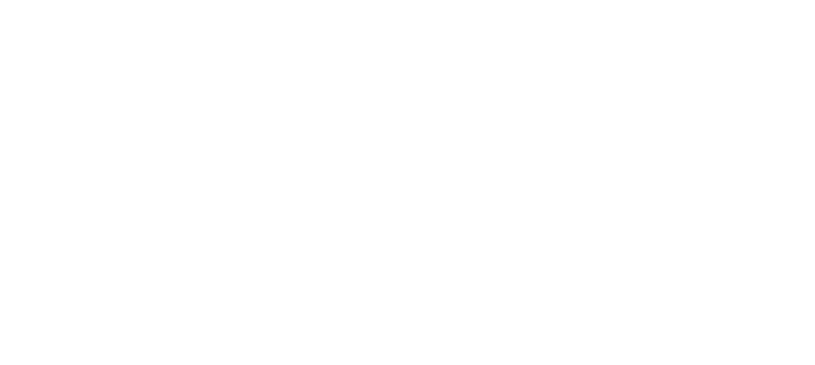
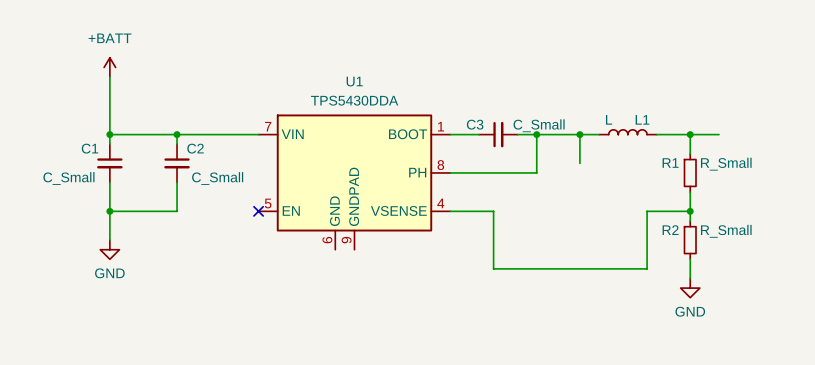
power symbol: none -> +BATT (109, 67)
wire: none -> (109, 77) (109, 144)
L1: none -> L (627, 132)
wire: none -> (109, 134) (258, 134)
junction: none -> (109, 134)
wire: none -> (177, 134) (177, 144)
junction: none -> (177, 134)
wire: none -> (450, 134) (479, 134)
C3: none -> C_Small (498, 134)
wire: none -> (517, 134) (599, 134)
wire: none -> (536, 134) (536, 172) (450, 172)
junction: none -> (536, 134)
wire: none -> (579, 134) (579, 163)
junction: none -> (579, 134)
wire: none -> (656, 134) (719, 134)
wire: none -> (690, 134) (690, 153)
junction: none -> (690, 134)
C1: none -> C_Small (109, 163)
C2: none -> C_Small (177, 163)
R1: none -> R_Small (690, 172)
wire: none -> (109, 182) (109, 240)
wire: none -> (177, 182) (177, 211) (109, 211)
U1: none -> TPS5430DDA (354, 182)
wire: none -> (690, 192) (690, 220)
junction: none -> (109, 211)
no-connect mark: none -> (258, 211)
wire: none -> (450, 211) (493, 211) (493, 268) (647, 268) (647, 211) (690, 211)
junction: none -> (690, 211)
R2: none -> R_Small (690, 240)
power symbol: none -> GND (109, 249)
wire: none -> (690, 259) (690, 278)
power symbol: none -> GND (690, 288)

